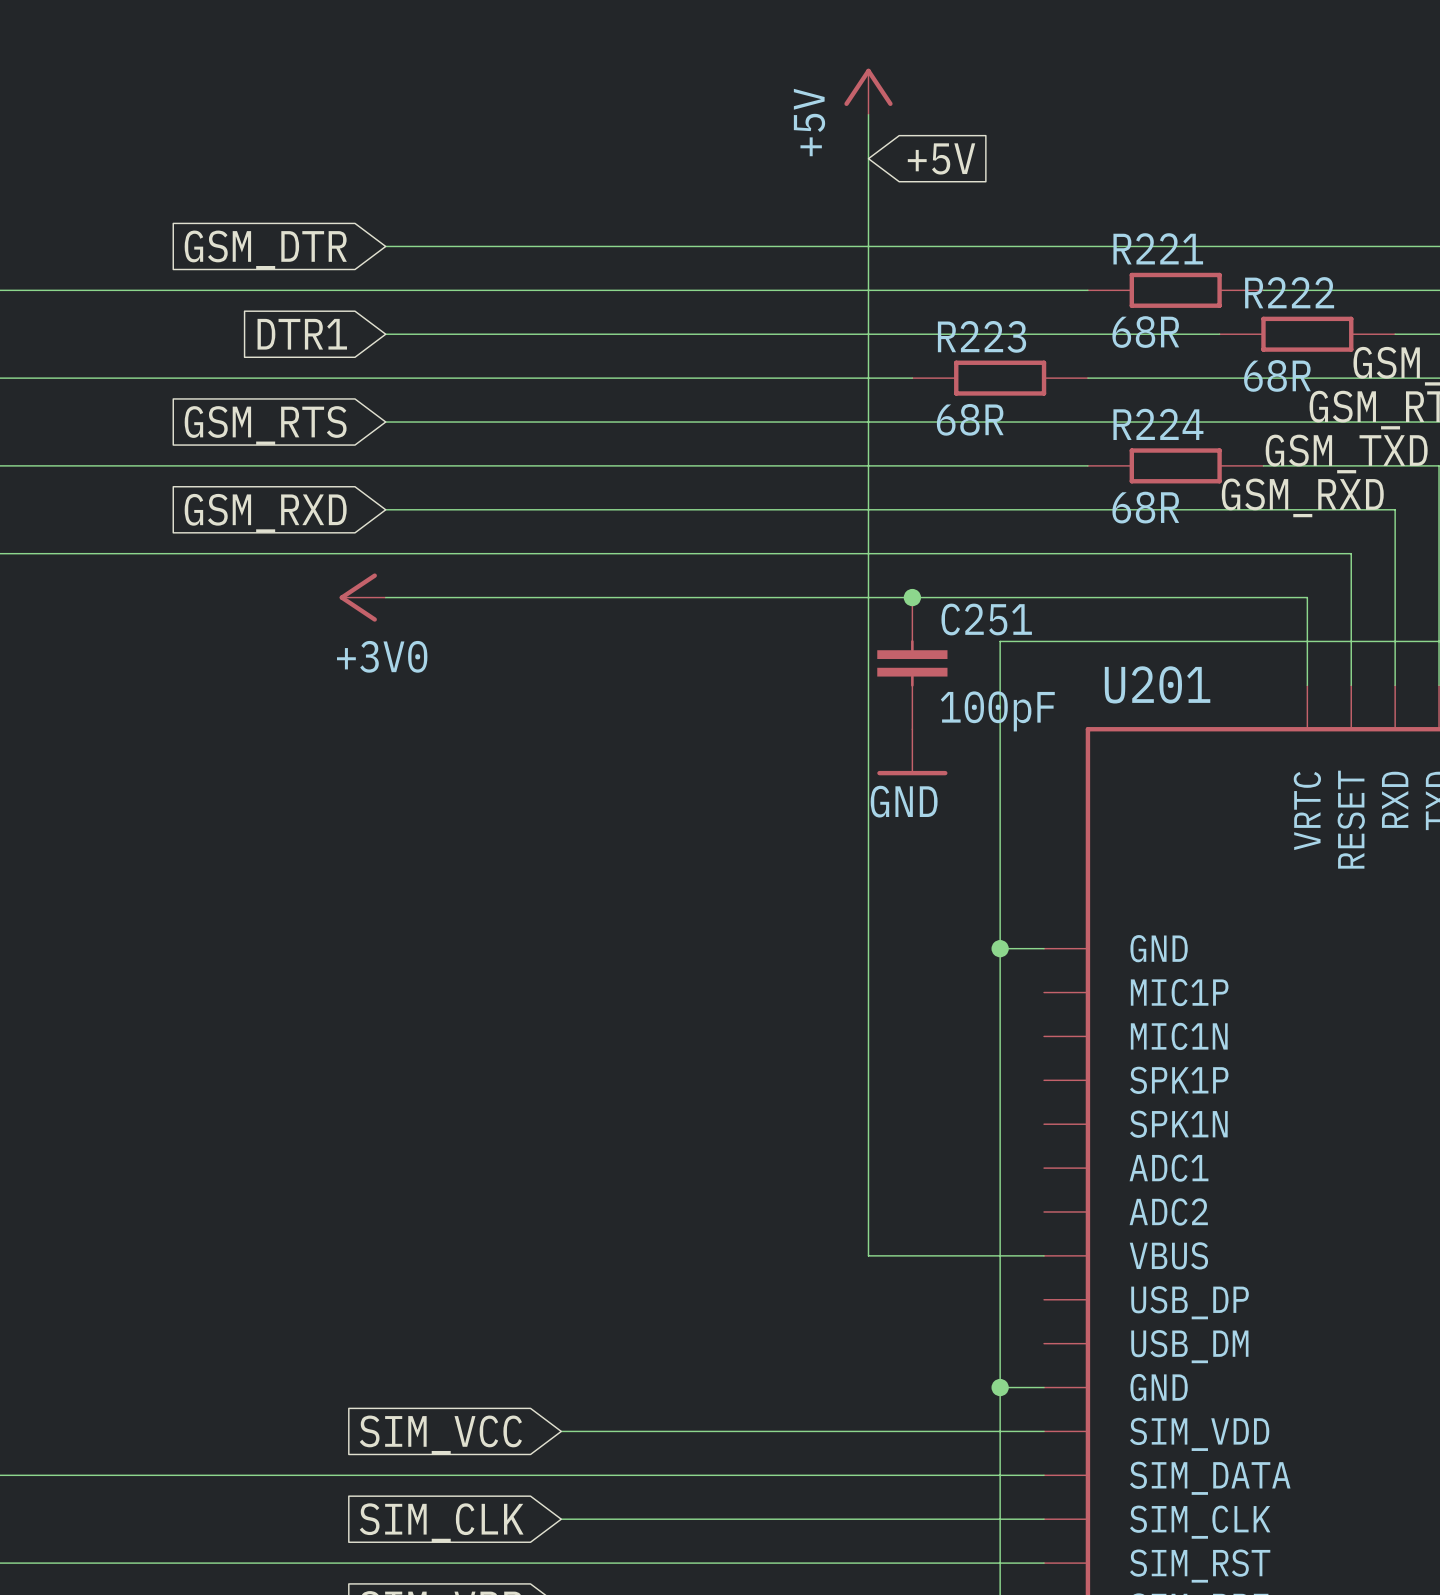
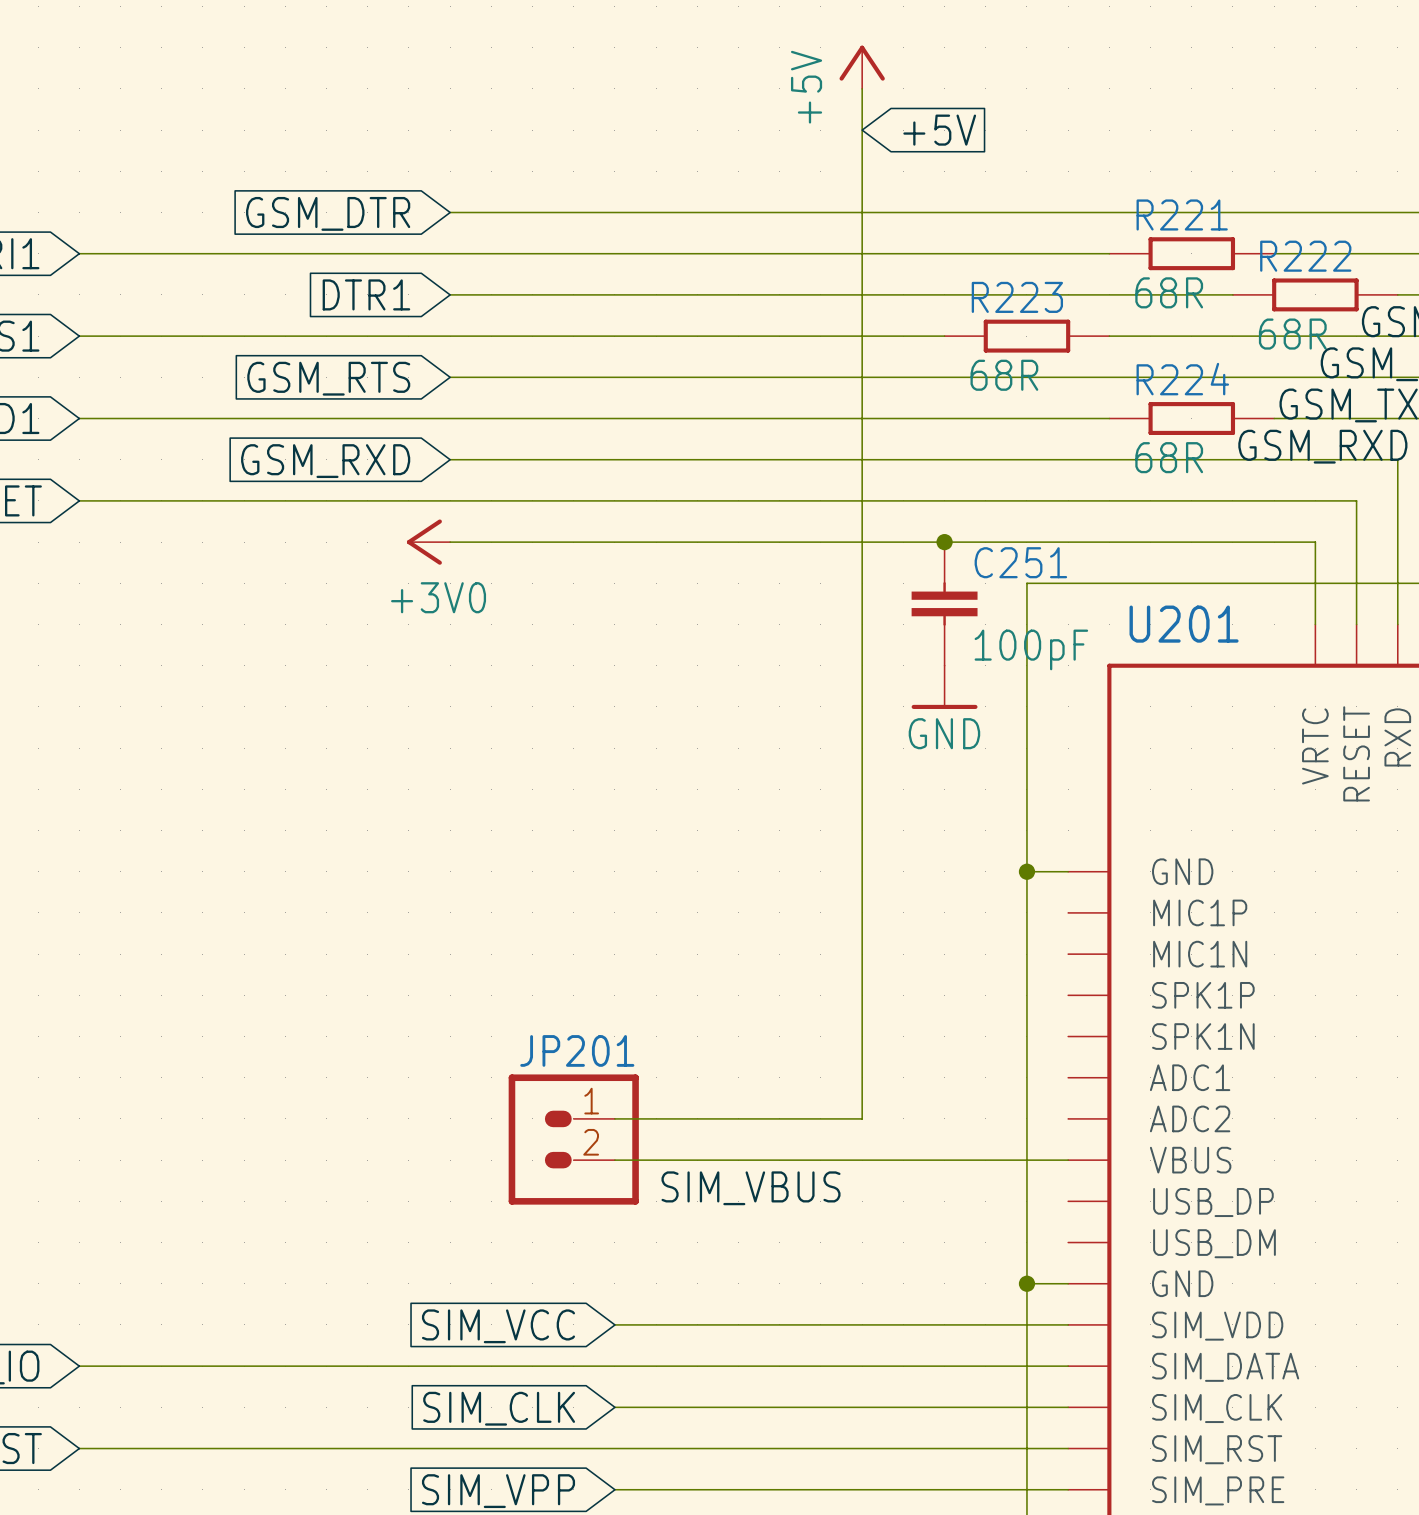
power symbol position: +5V (868, 91) -> +5V (862, 67)
wire: none -> (862, 88) (862, 1118) (614, 1118)
wire: (868, 114) (868, 1255) -> (614, 1160) (903, 1160)
global label position: +5V (941, 158) -> +5V (939, 130)
JP201: none -> (573, 1139)
label: none -> SIM_VBUS (751, 1188)

